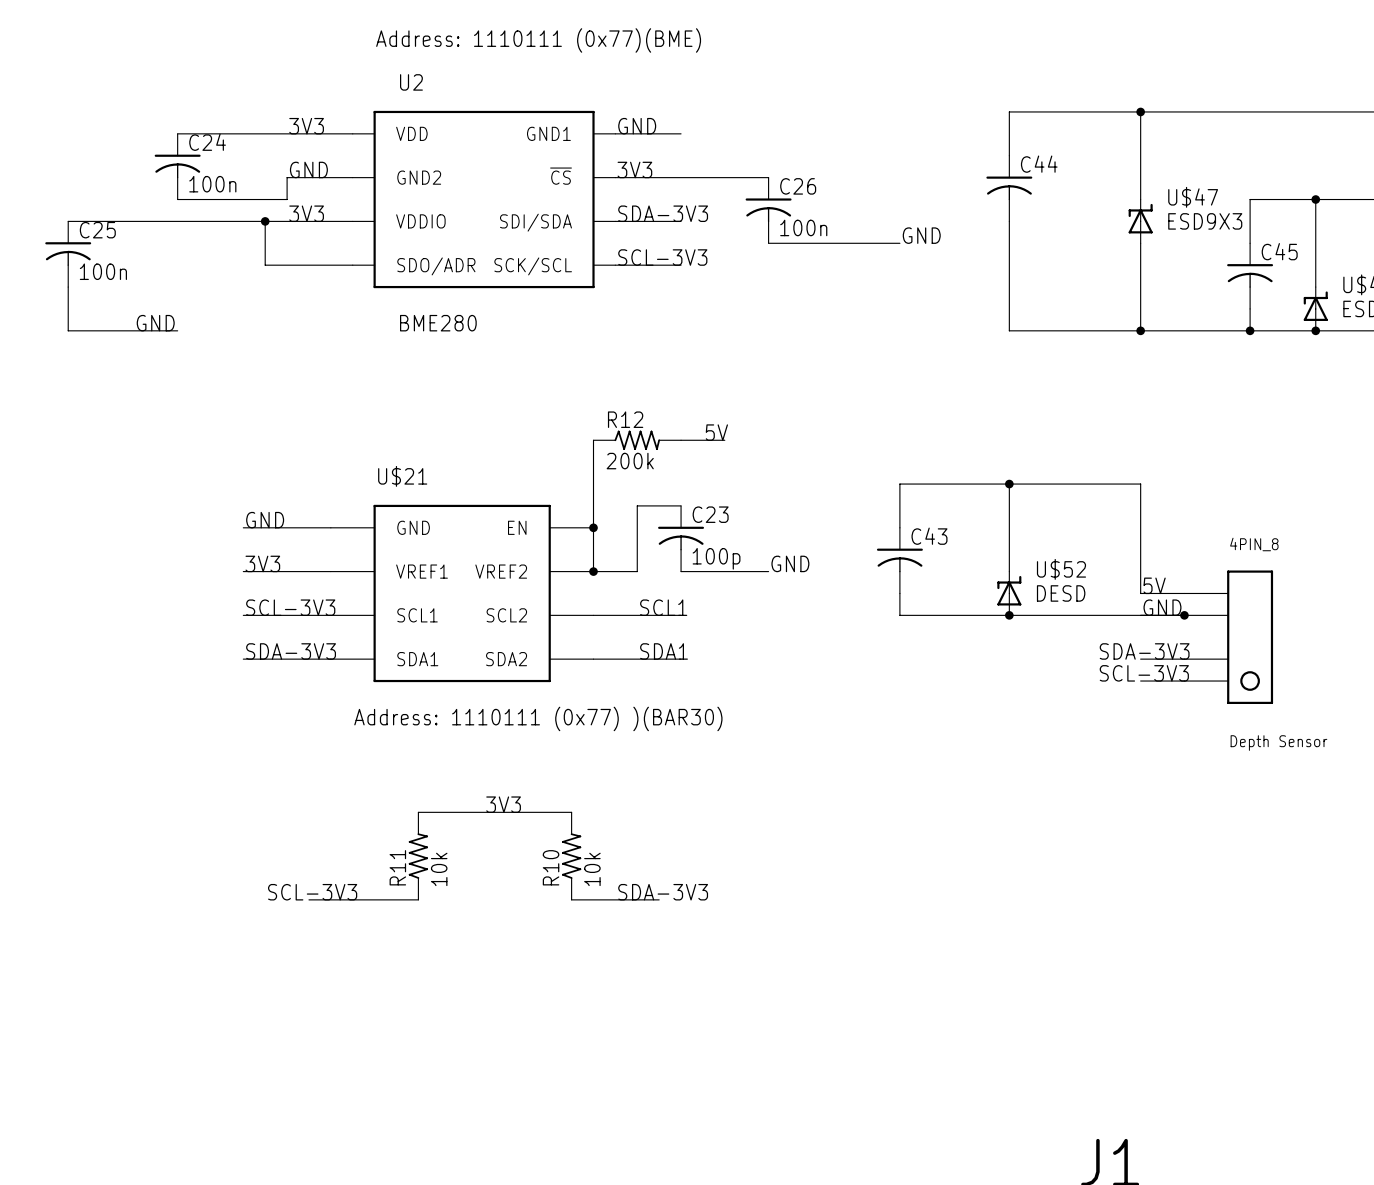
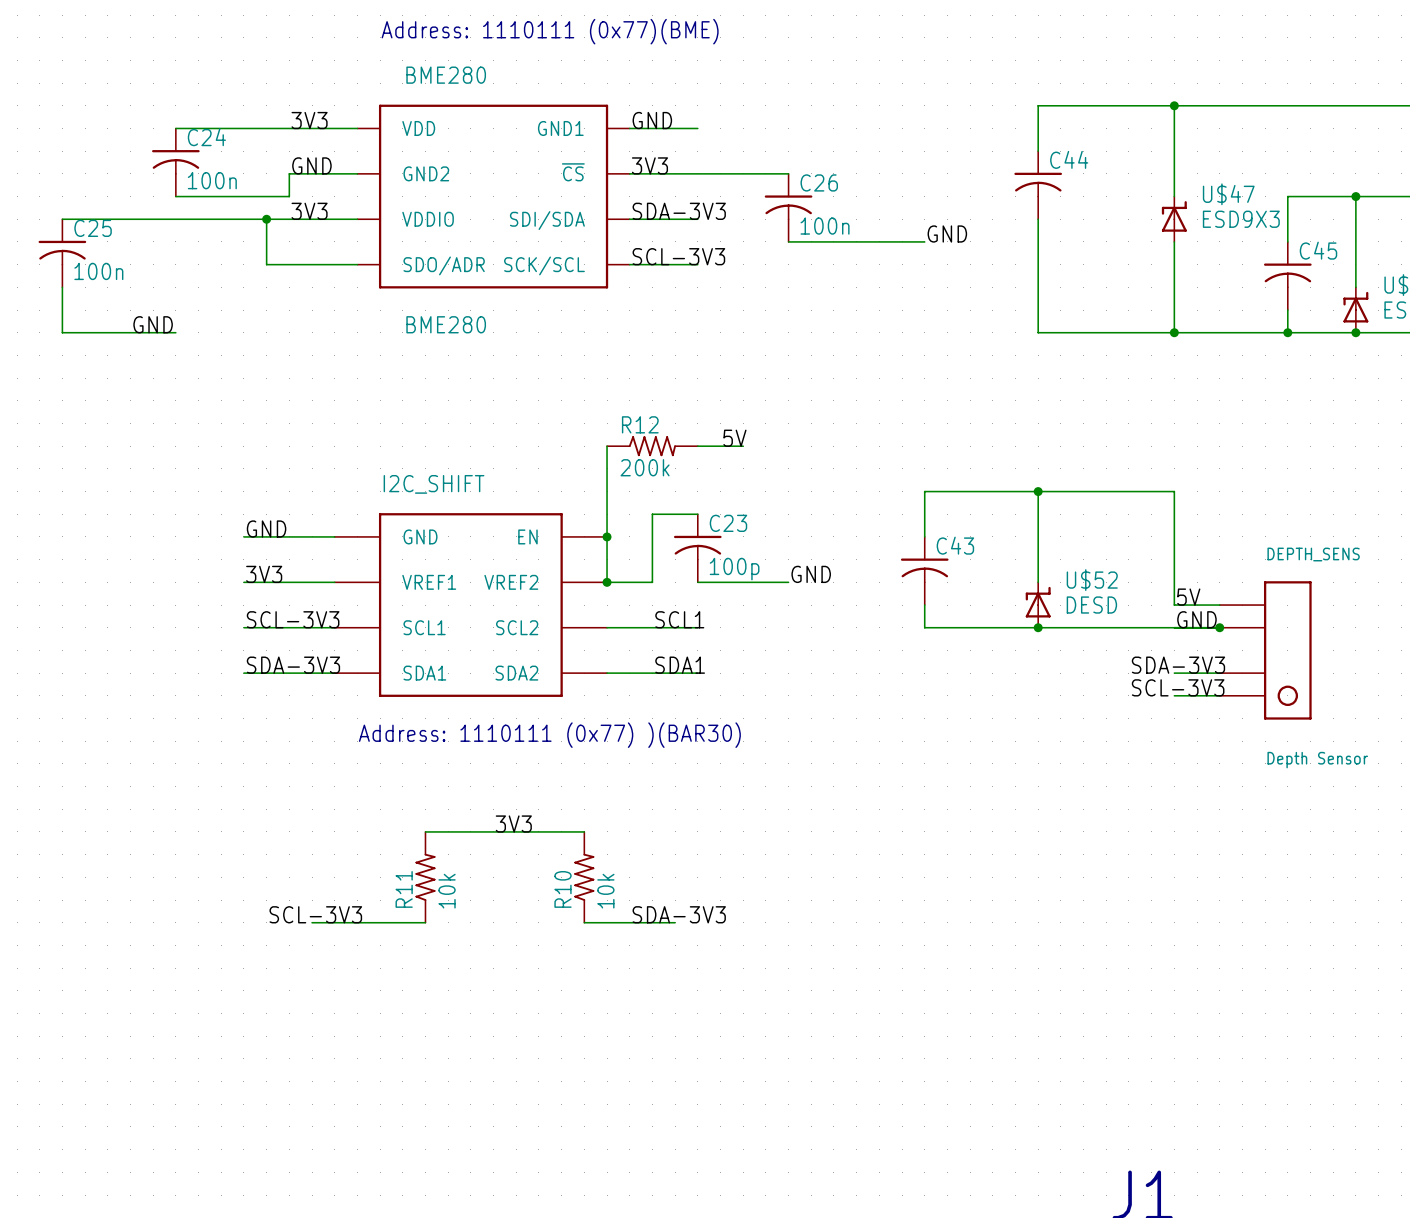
U2 name: U2 (411, 82) -> BME280 (446, 75)
U$21 name: U$21 (402, 476) -> I2C_SHIFT (434, 484)
4PIN_8 name: 4PIN_8 (1254, 544) -> DEPTH_SENS (1313, 554)

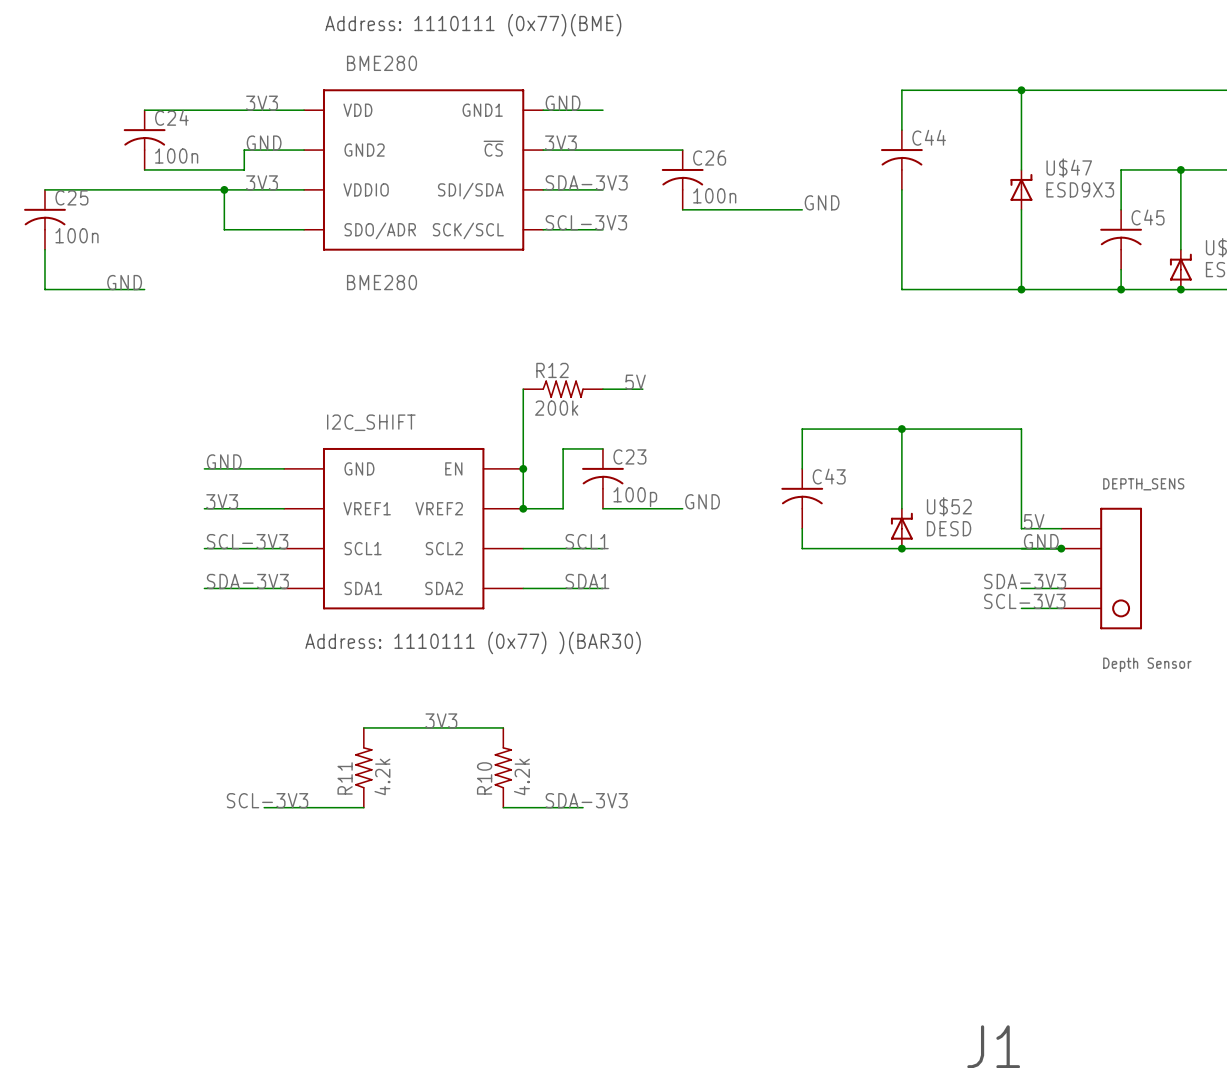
R11 value: 10k (447, 891) -> 4.2k (382, 776)
R10 value: 10k (605, 891) -> 4.2k (521, 776)

